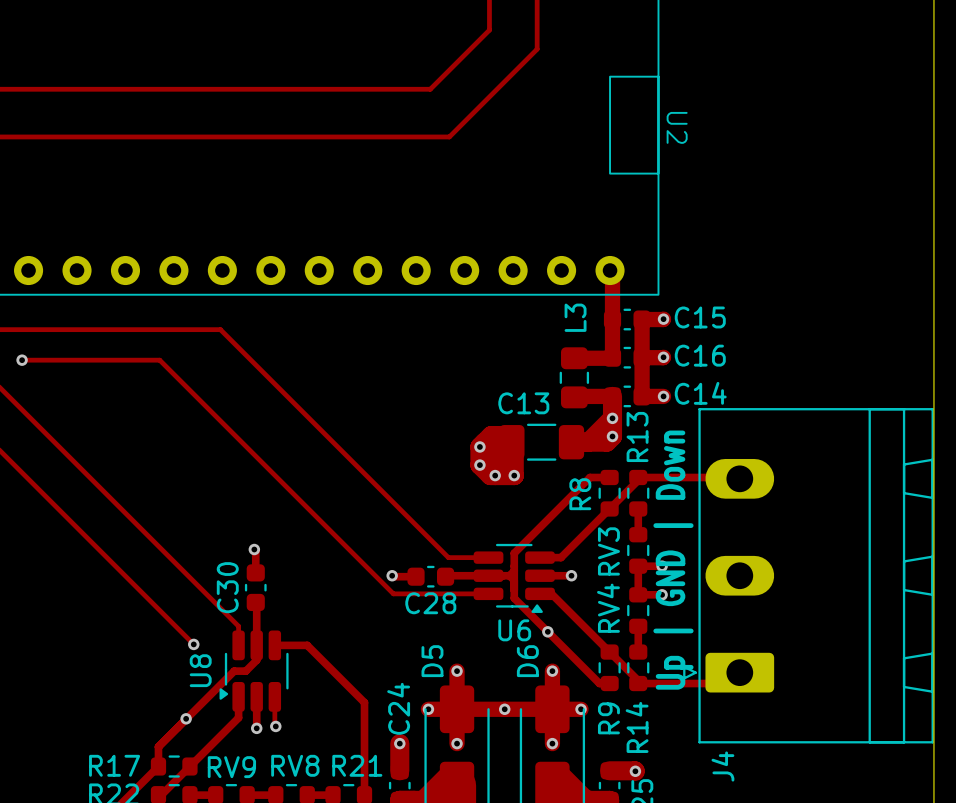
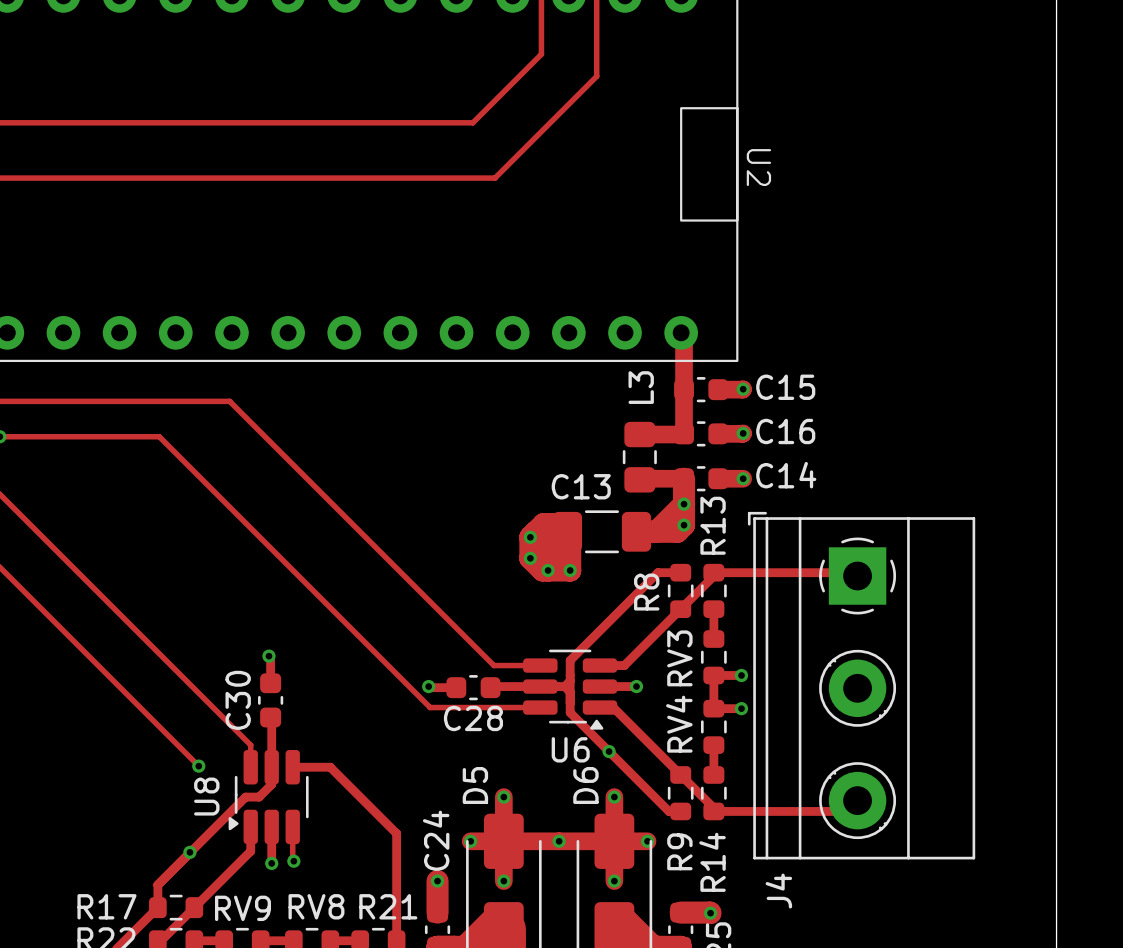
track: (642, 319) (642, 396) -> none
J4 footprint: [683, 408, 934, 744] -> [747, 511, 976, 860]
text: Up | GND | Down (673, 560) -> none

